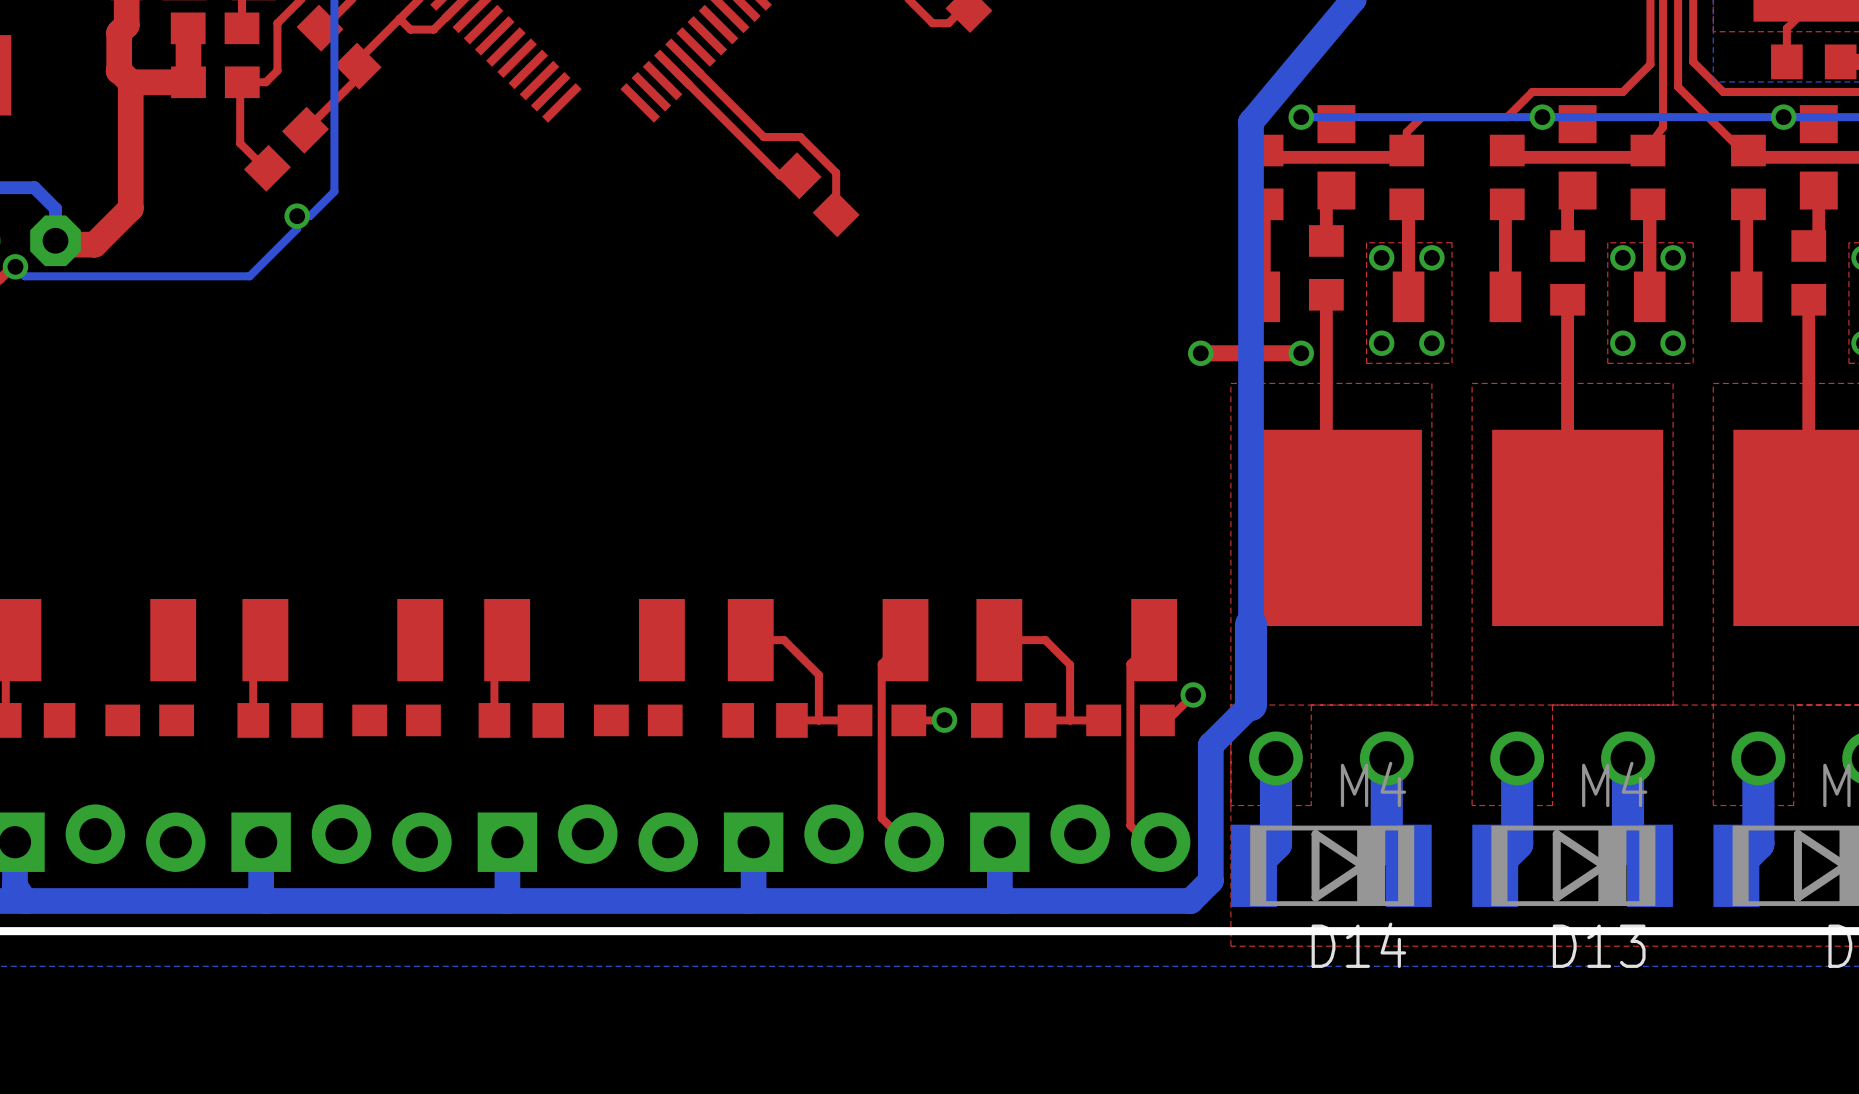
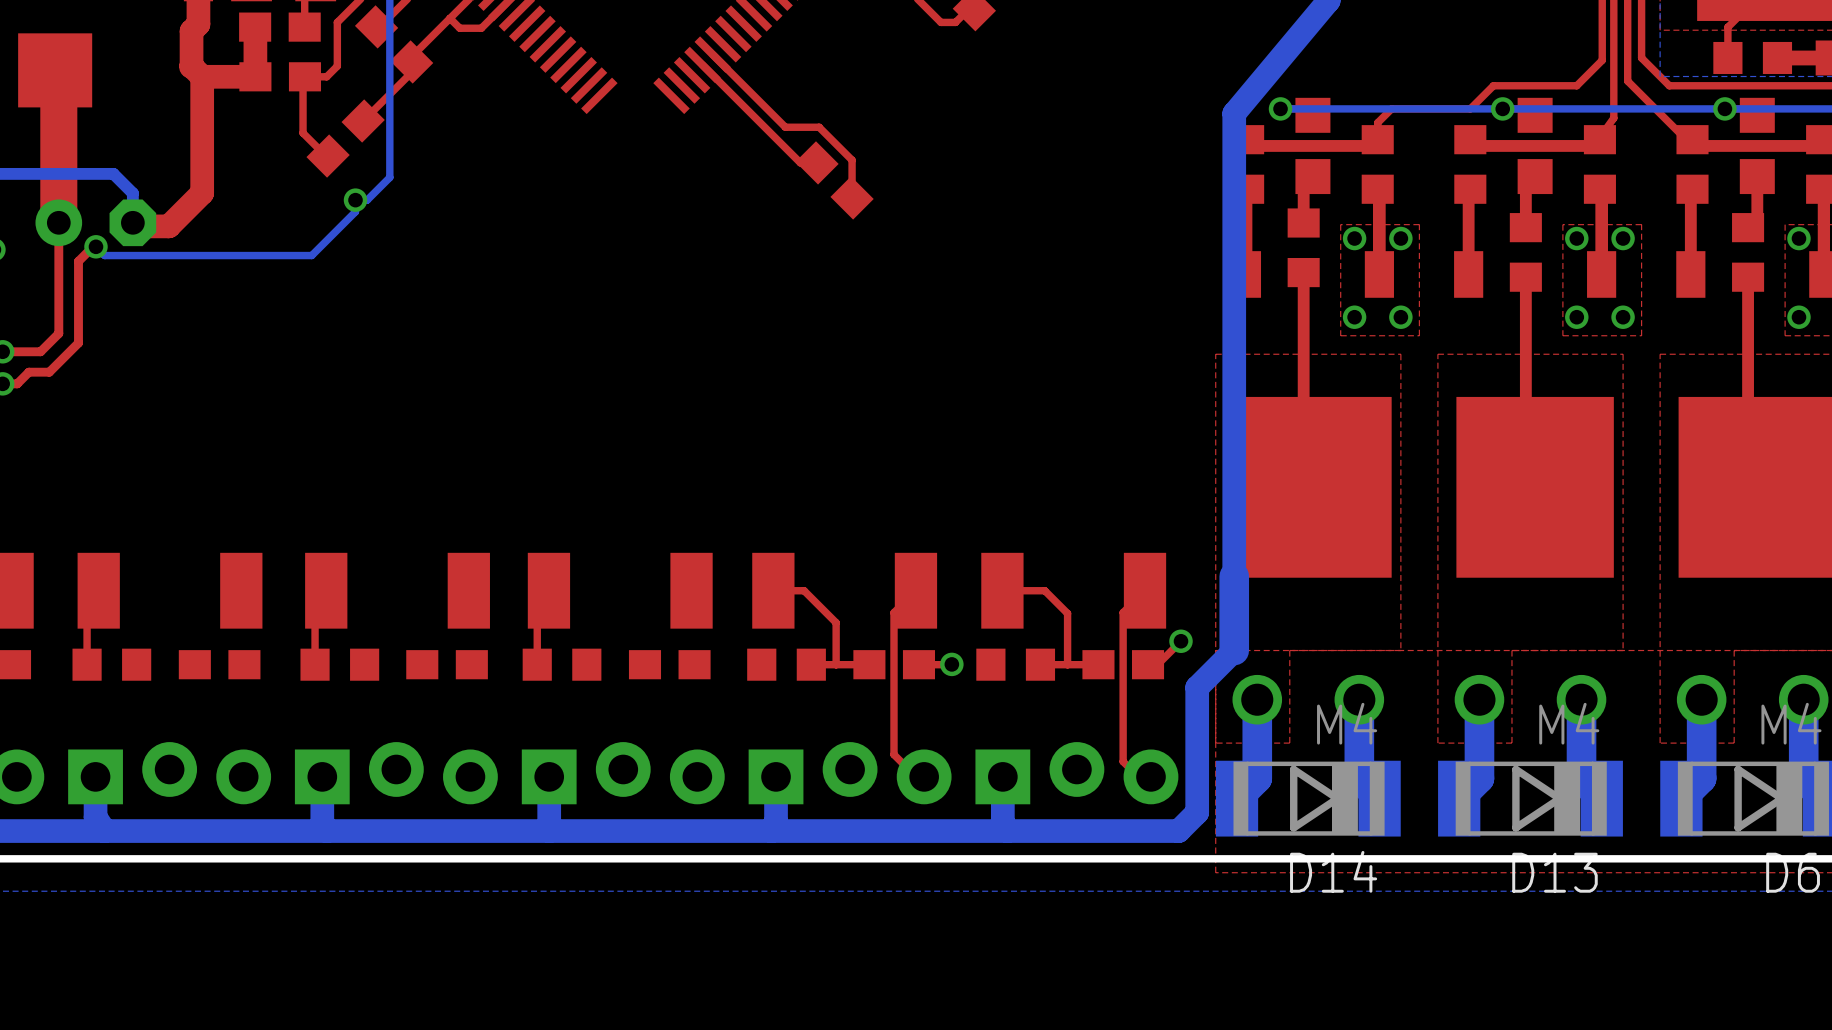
via: (1200, 353) -> none
top track: (1301, 353) (1200, 353) -> none
via: (1301, 353) -> none

